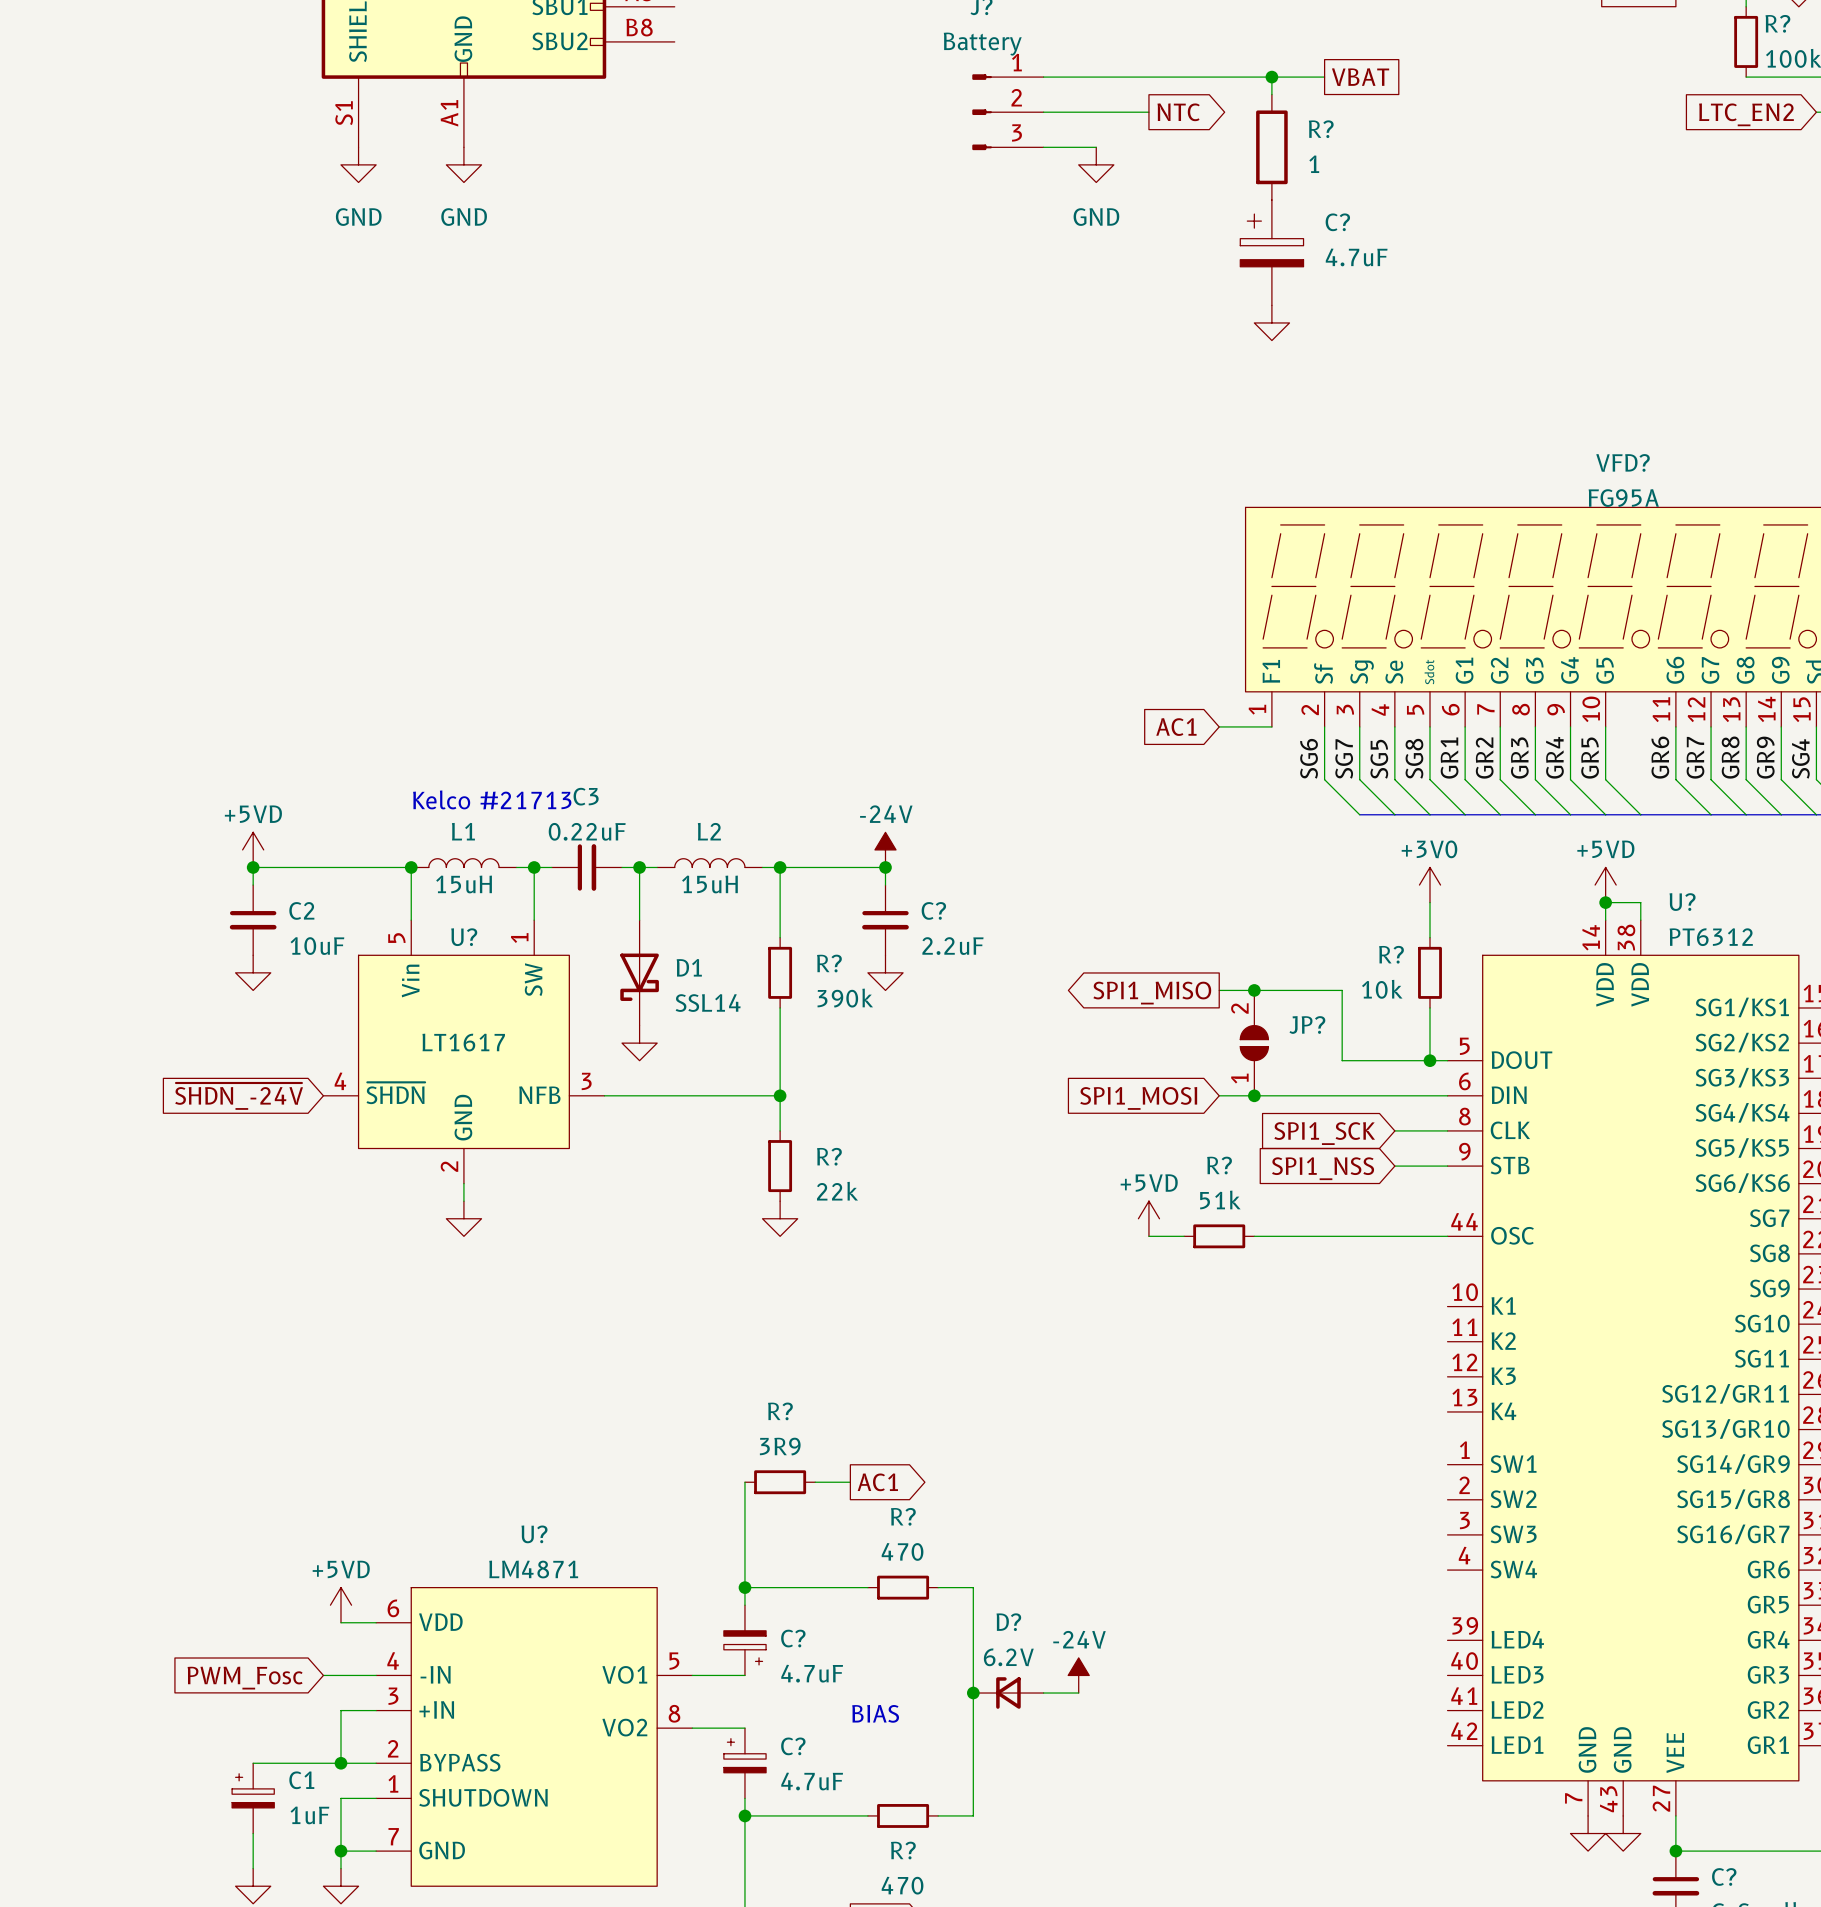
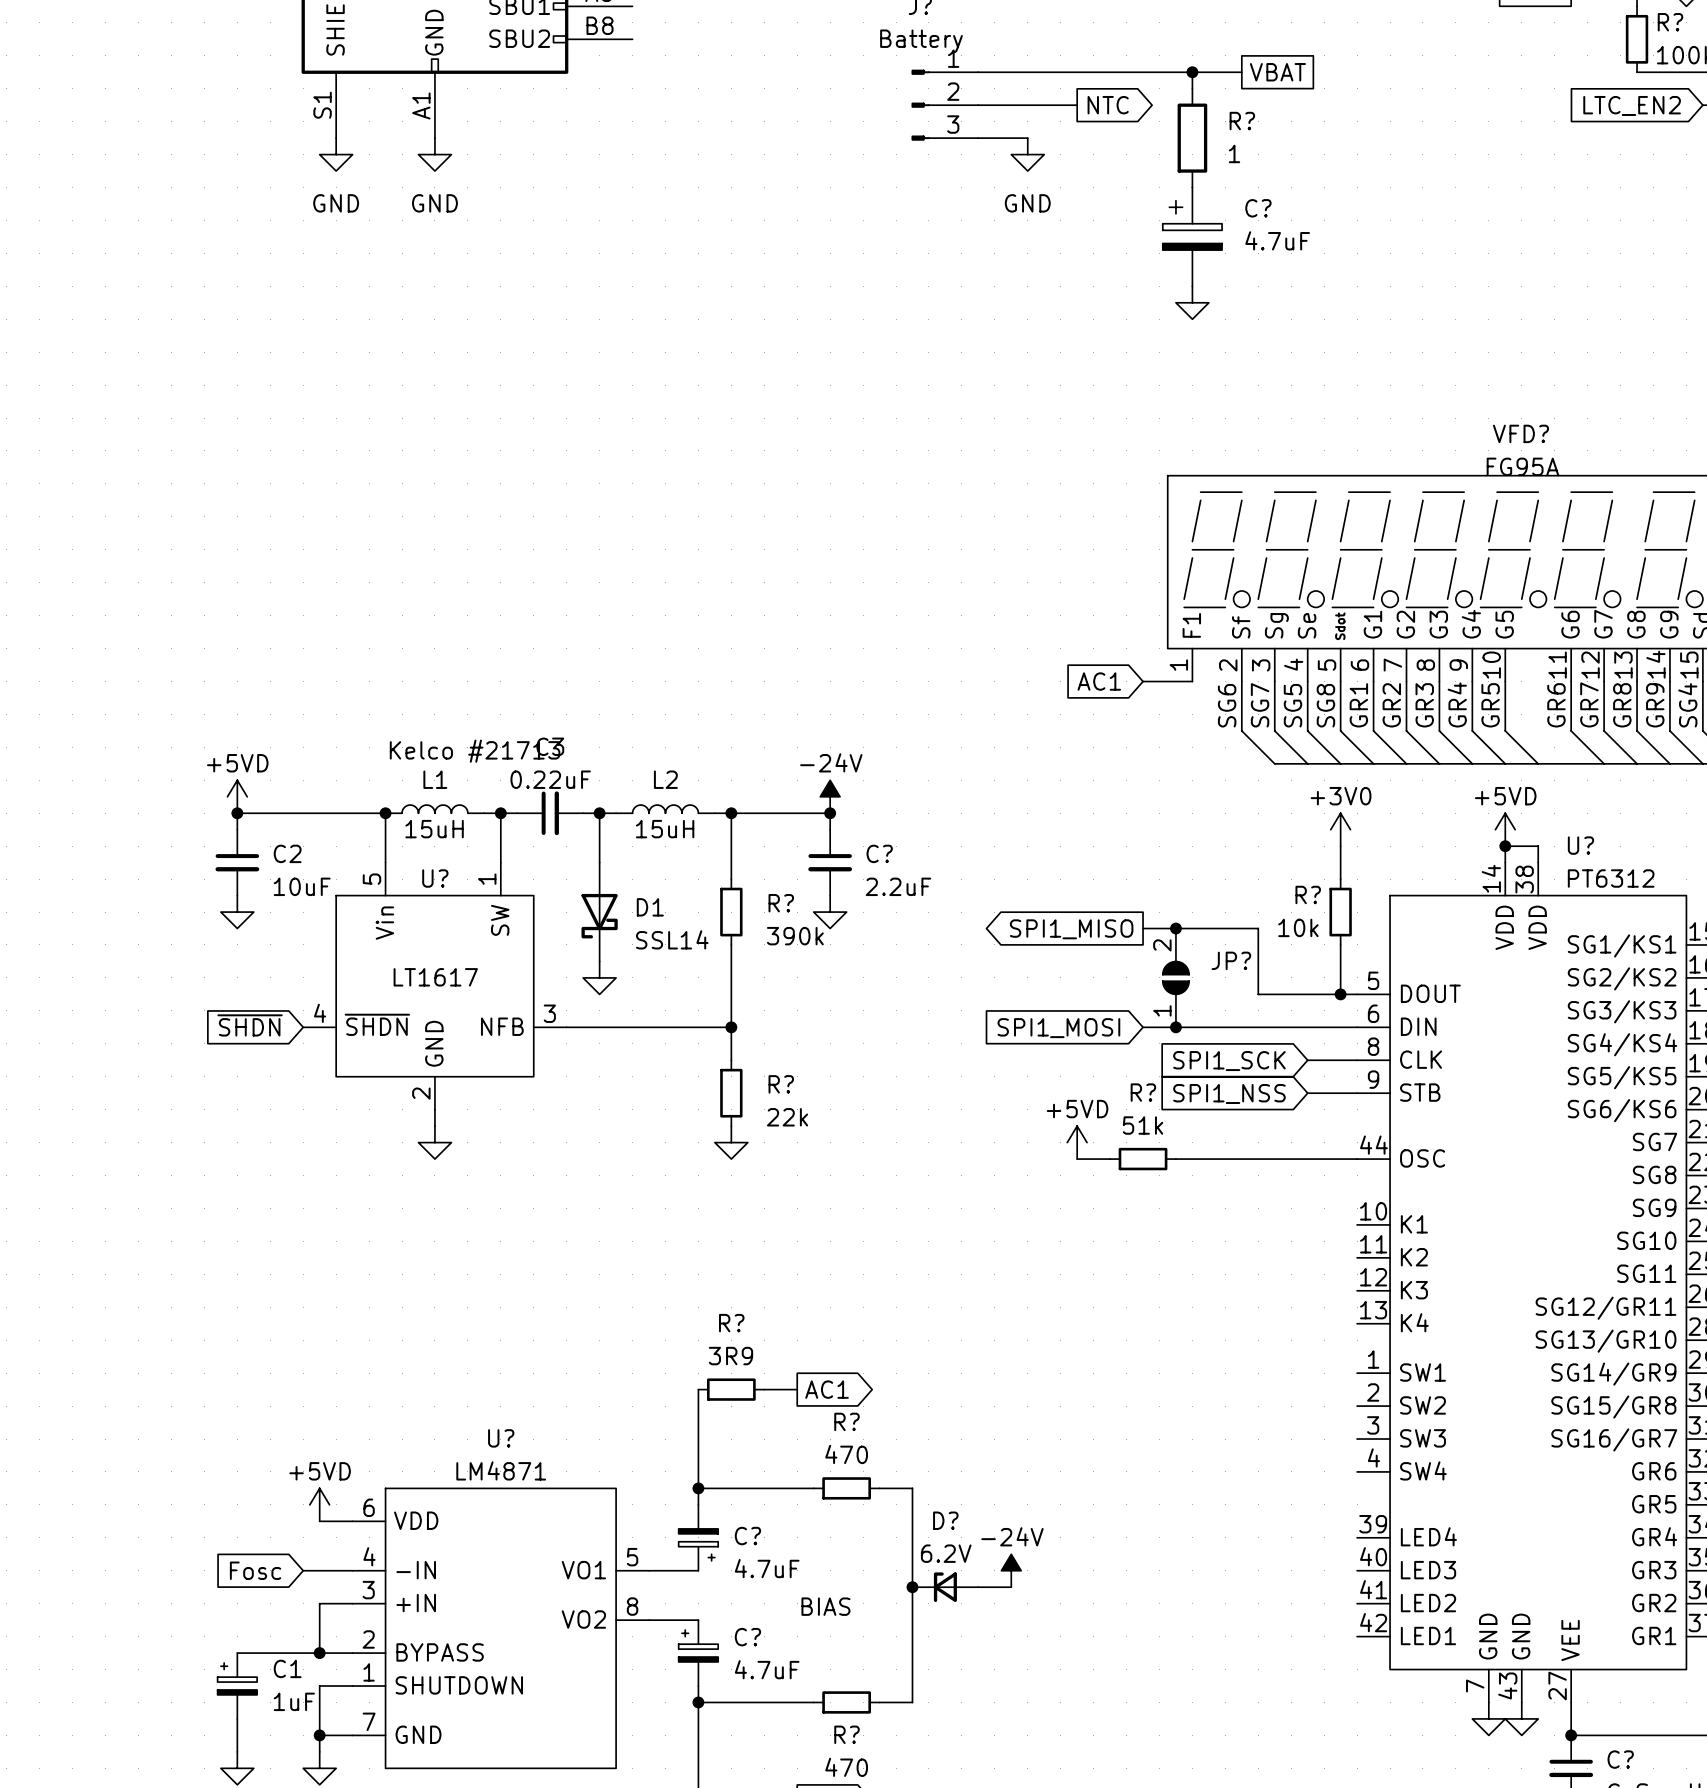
global label: ~{SHDN_-24V} (239, 1096) -> ~{SHDN} (250, 1025)
global label: PWM_Fosc (245, 1678) -> Fosc (255, 1570)

